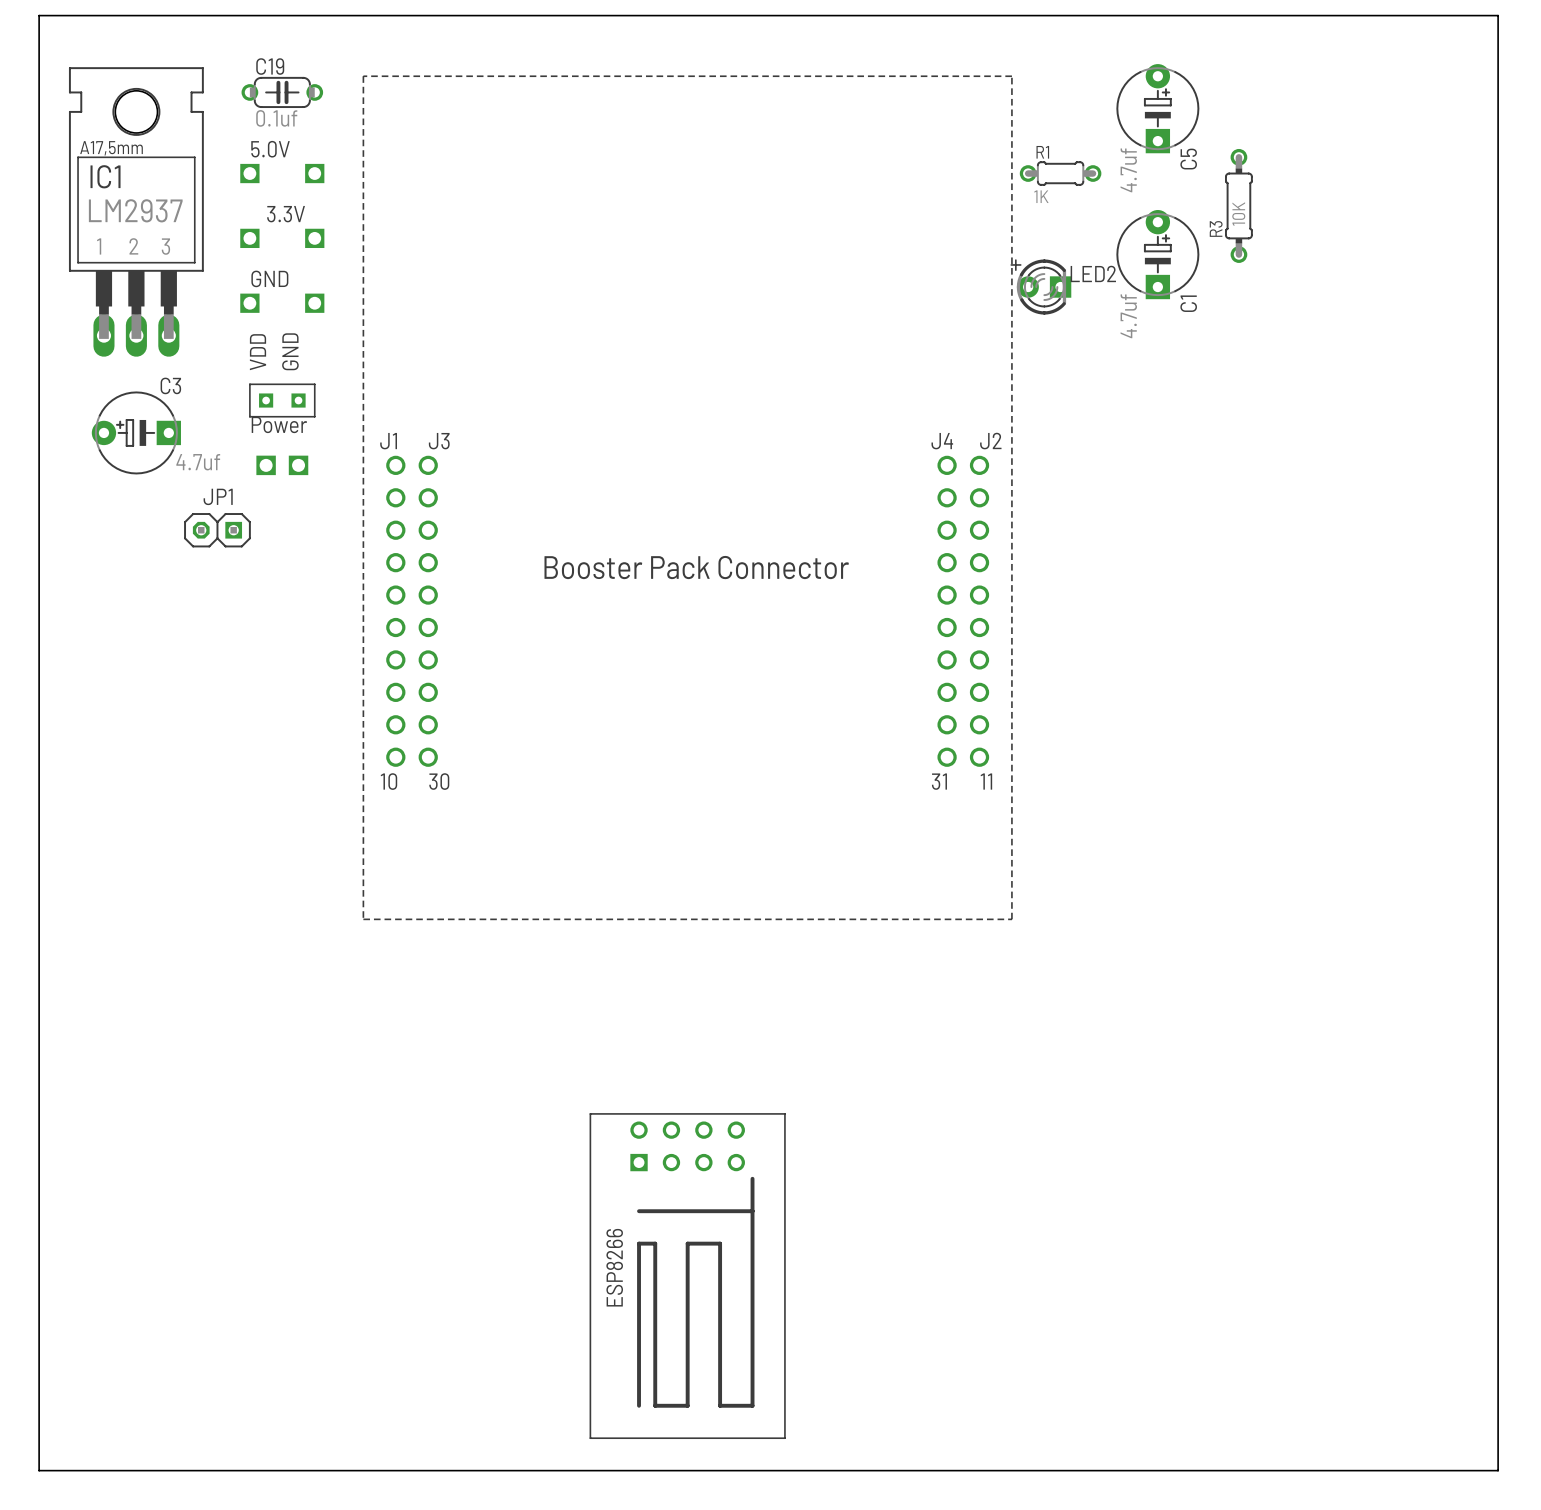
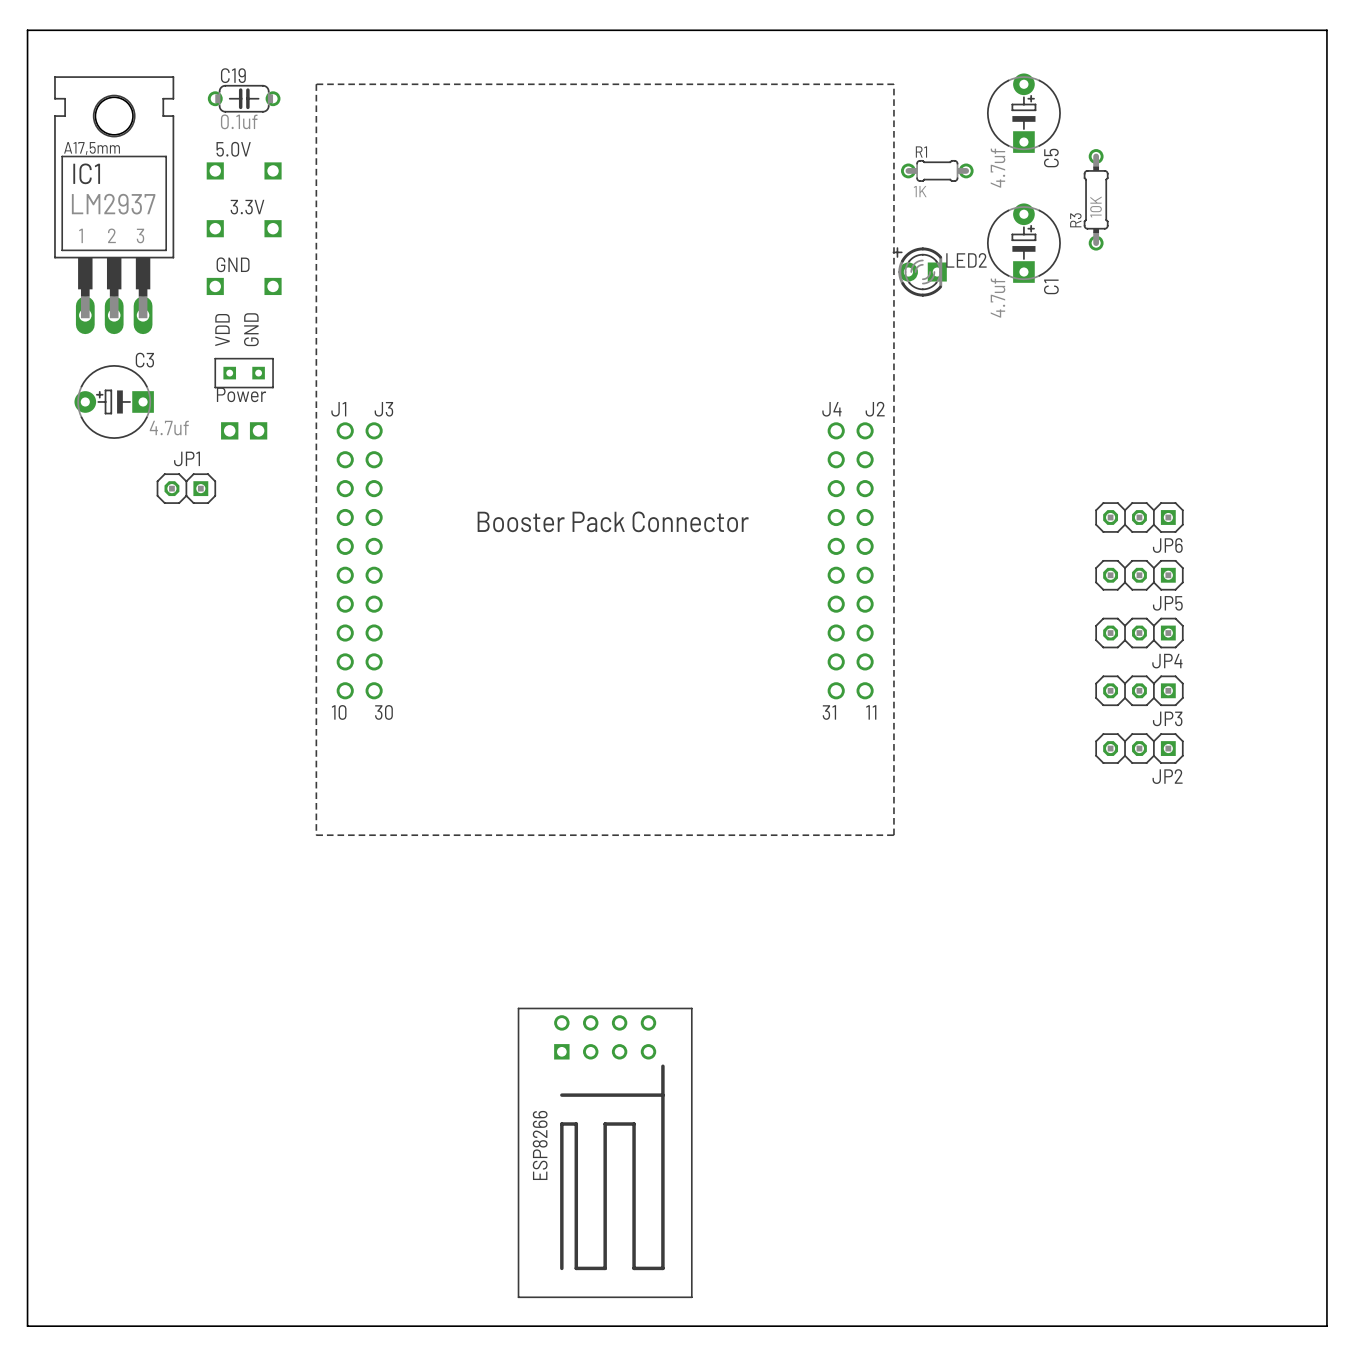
JP6: none -> (1139, 517)
JP5: none -> (1139, 575)
JP4: none -> (1139, 633)
JP3: none -> (1139, 690)
JP2: none -> (1139, 748)

